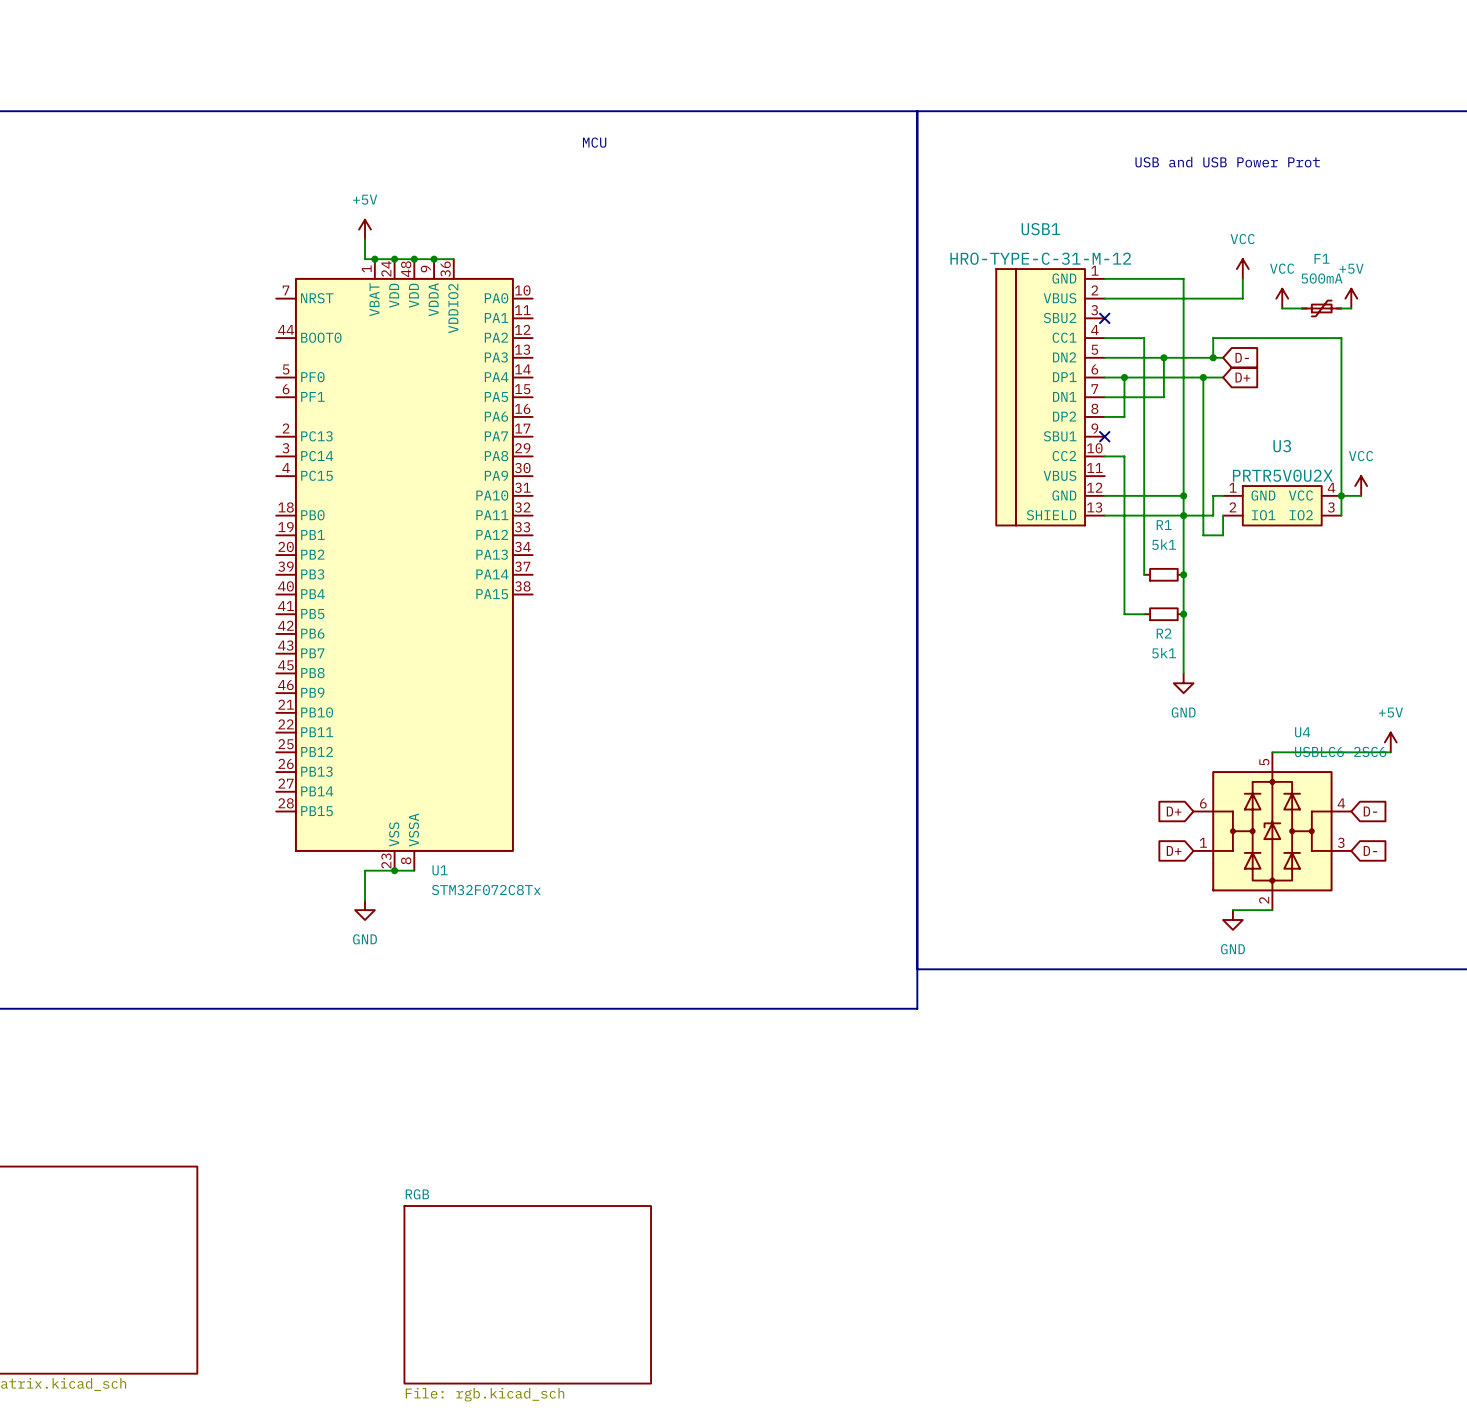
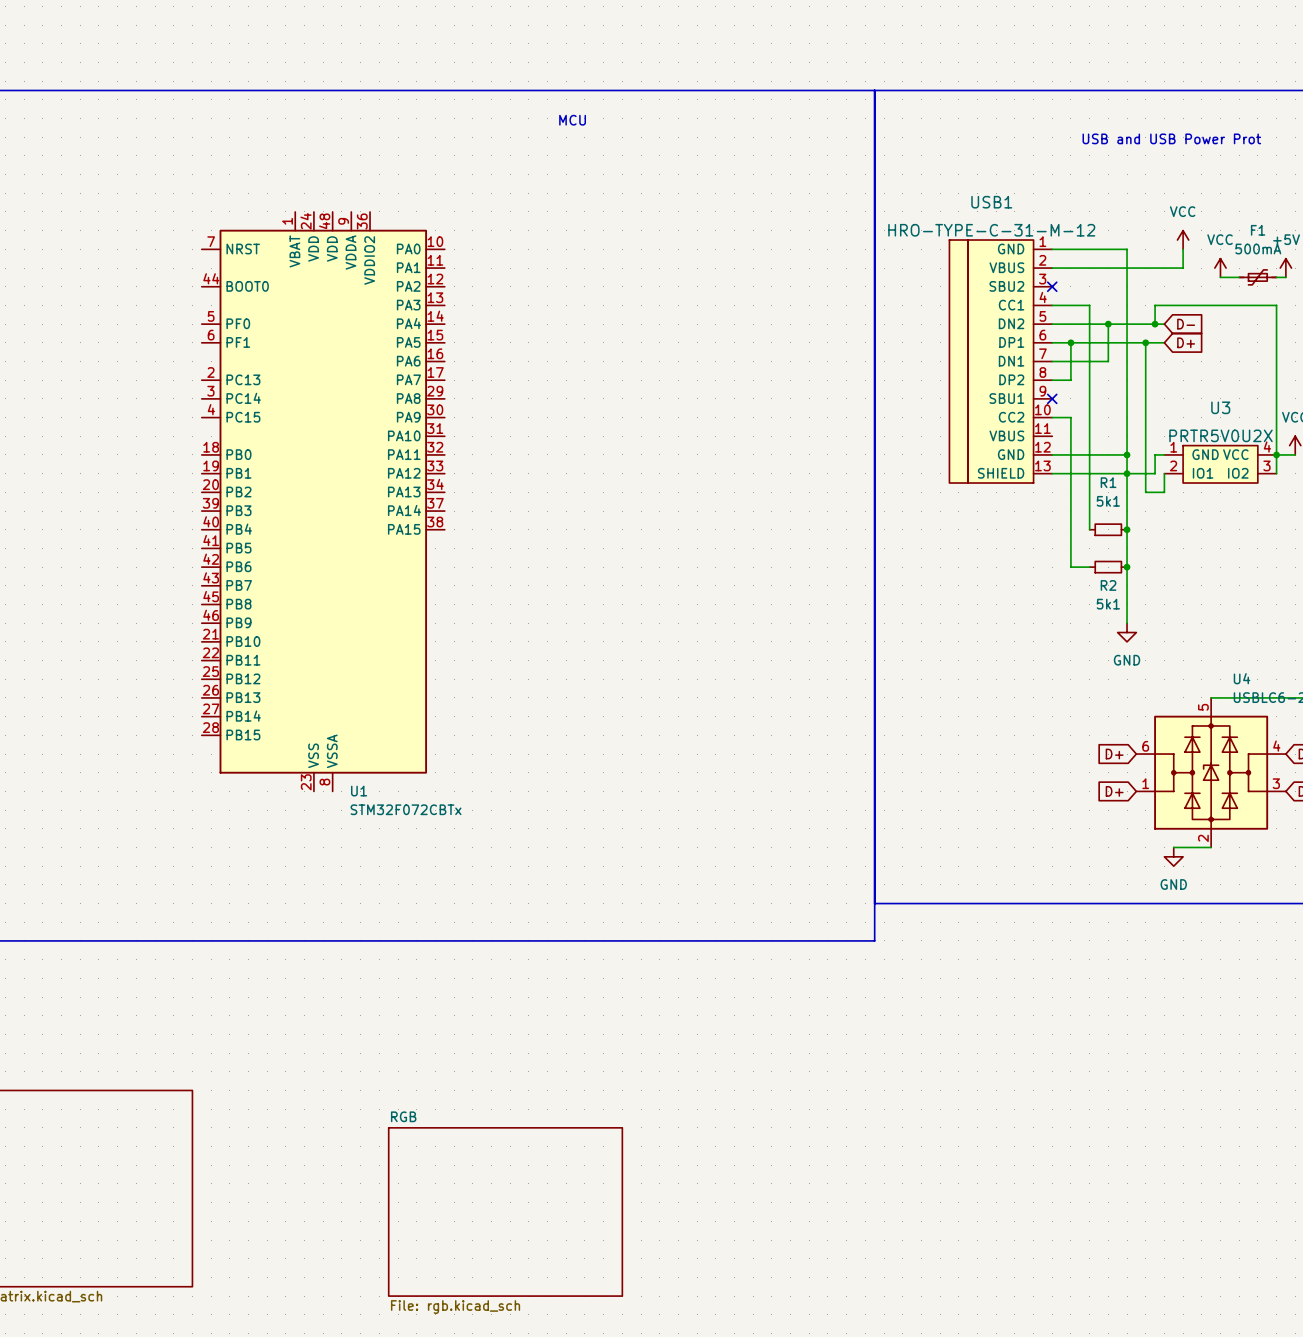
power symbol: +5V (365, 229) -> none
junction: (374, 259) -> none
junction: (394, 259) -> none
junction: (414, 259) -> none
junction: (434, 259) -> none
U1 position: (404, 564) -> (323, 501)
junction: (394, 870) -> none
wire: (414, 870) (365, 870) (365, 900) -> none
U1 value: STM32F072C8Tx (486, 890) -> STM32F072CBTx (406, 809)
power symbol: GND (365, 910) -> none

